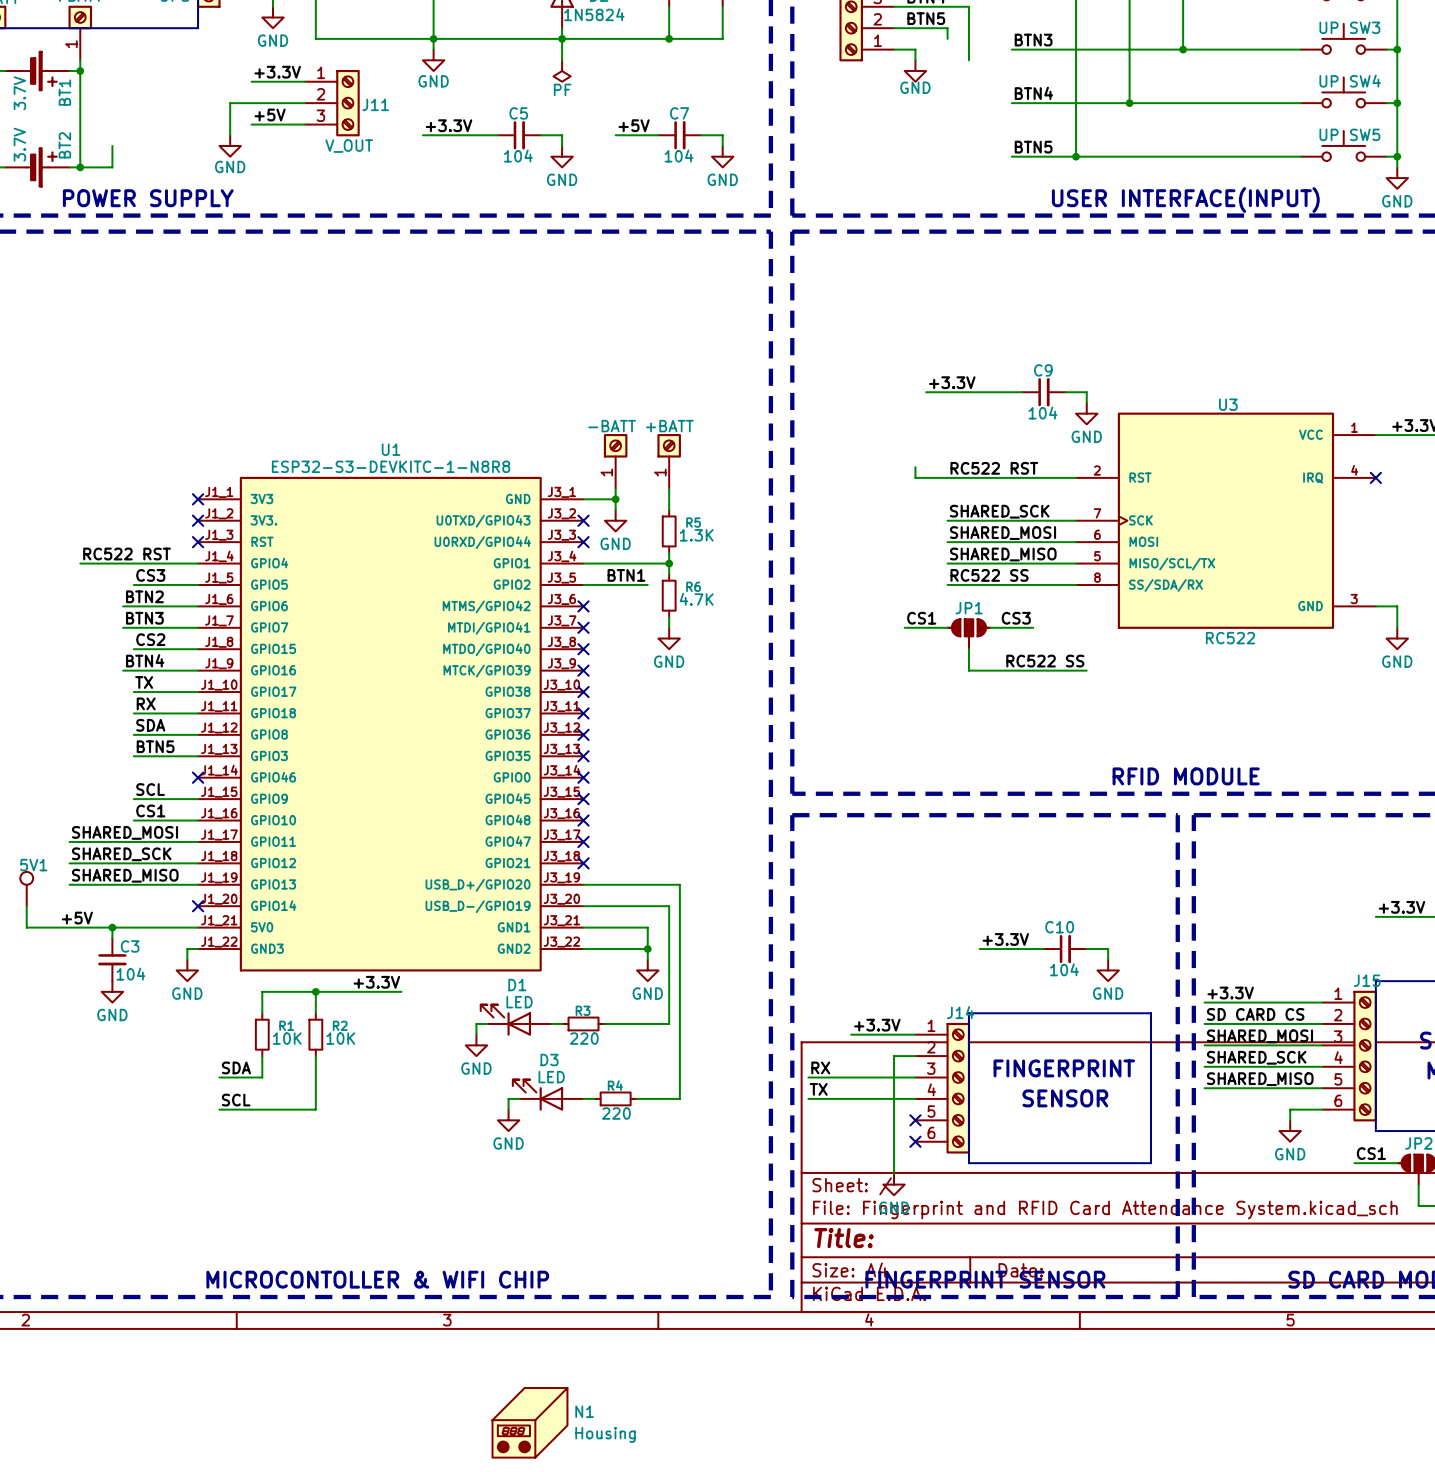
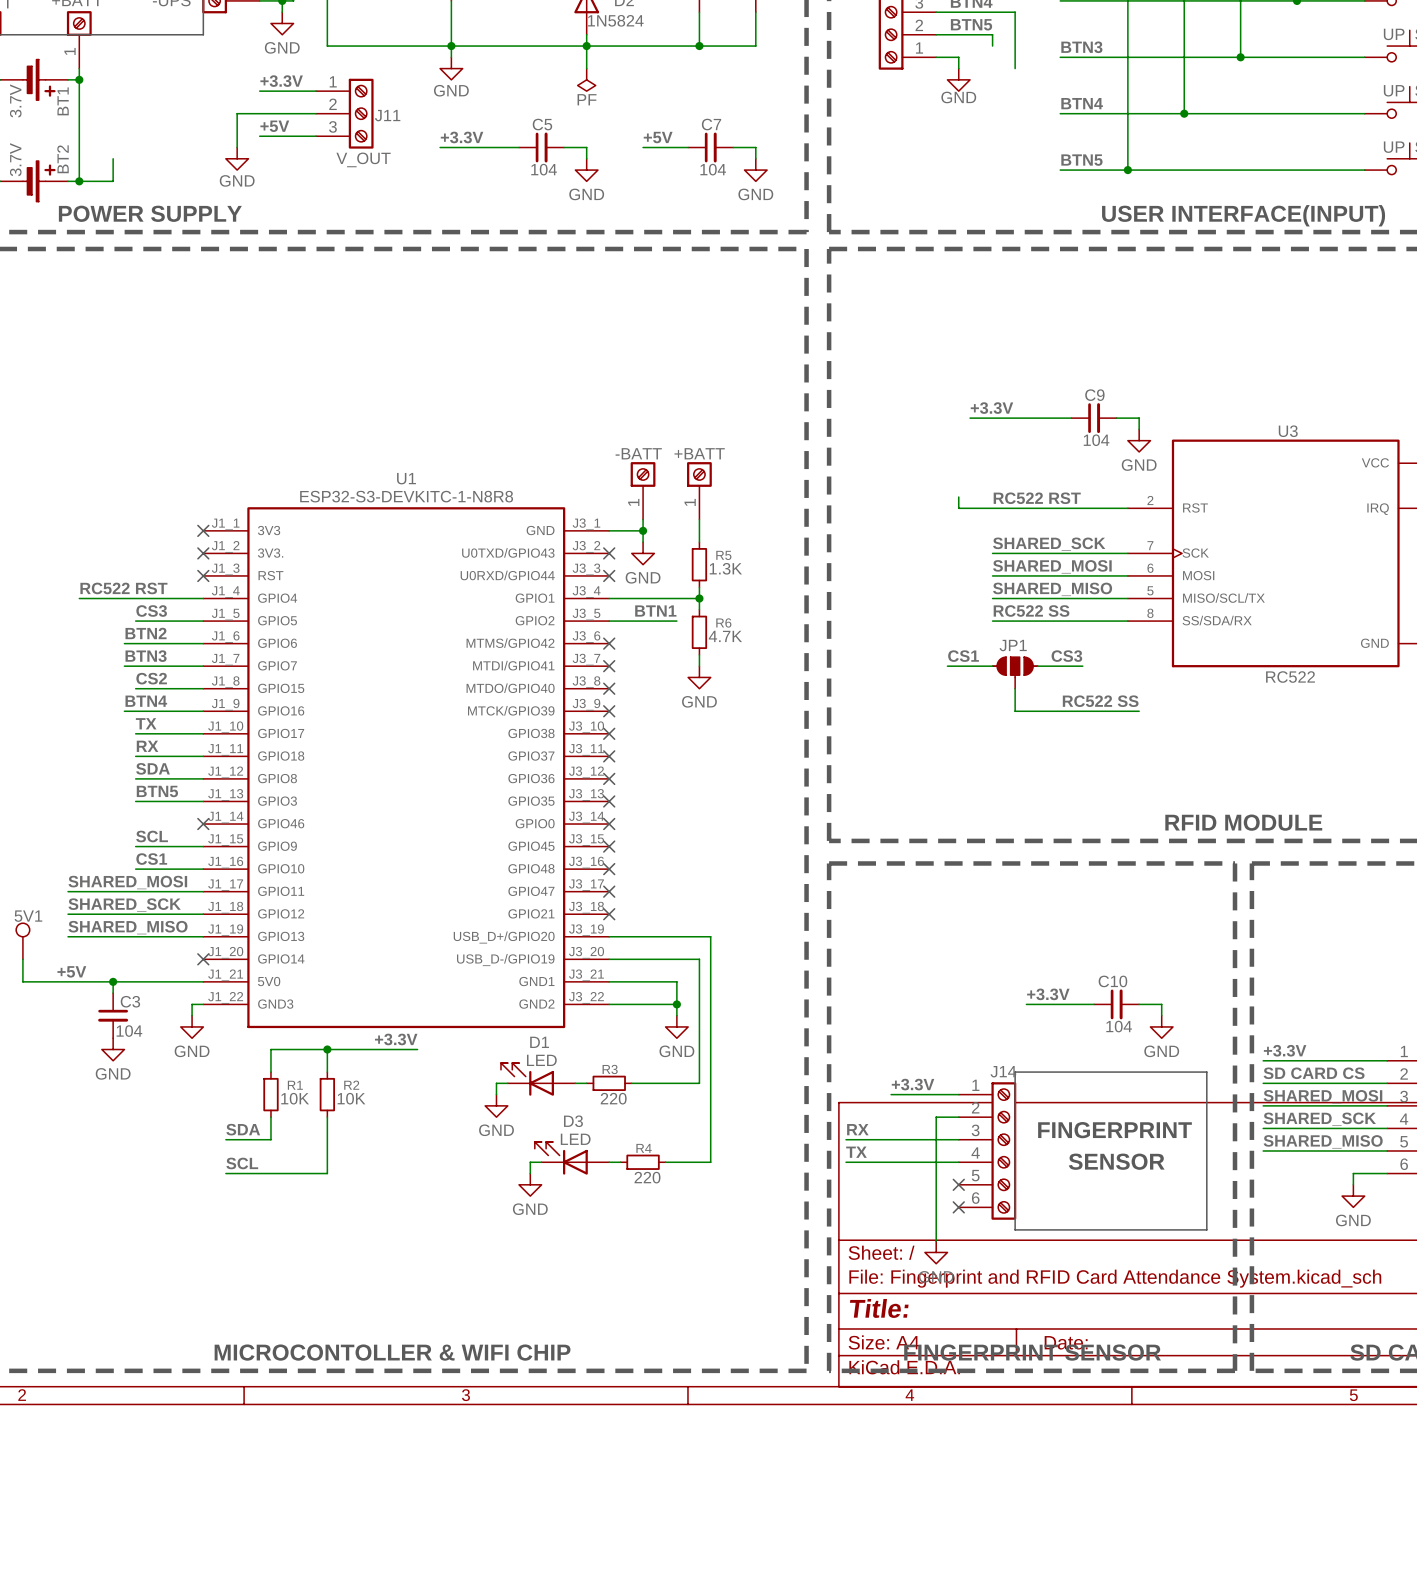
N1: Housing (529, 1422) -> none

